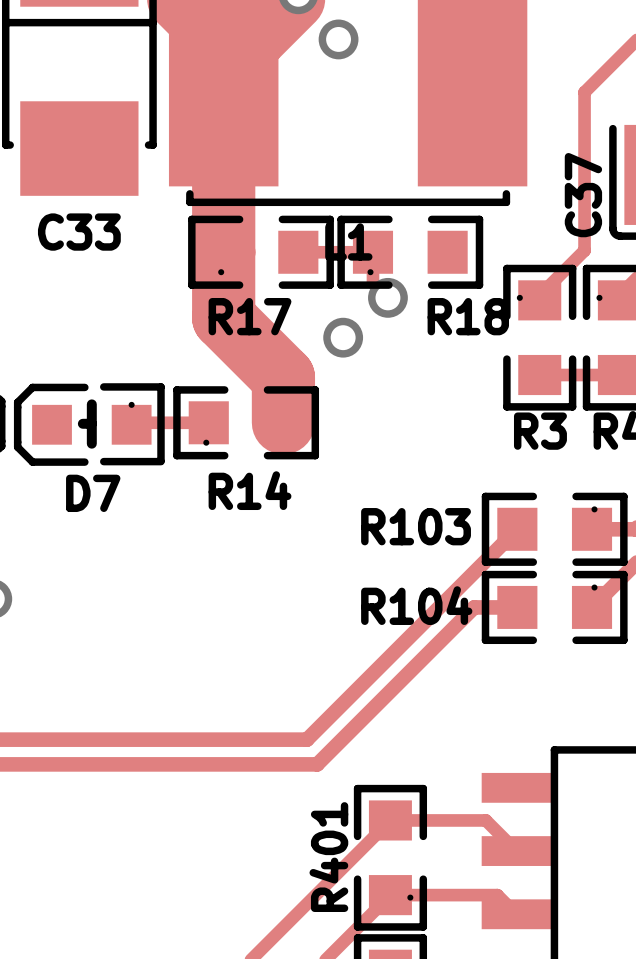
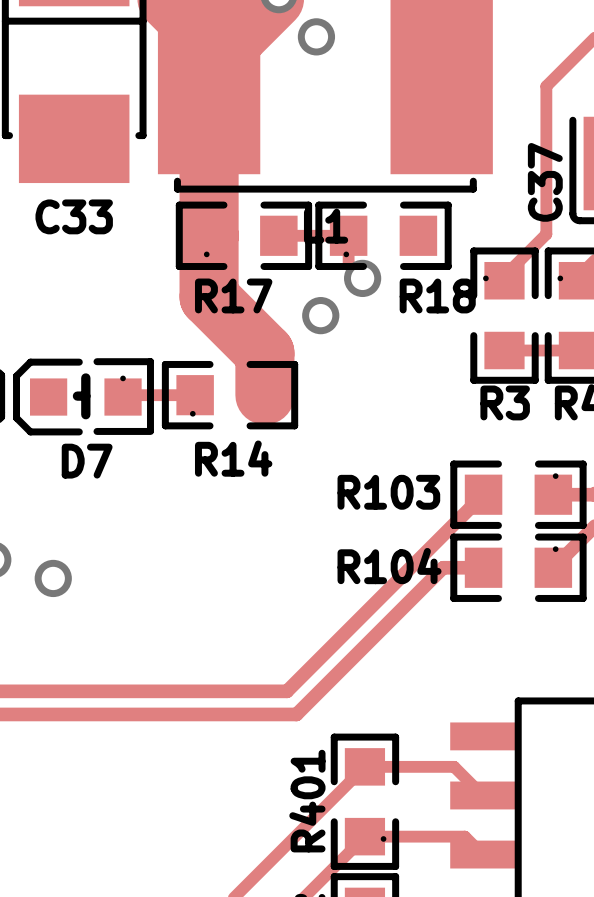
via: none -> (53, 578)

